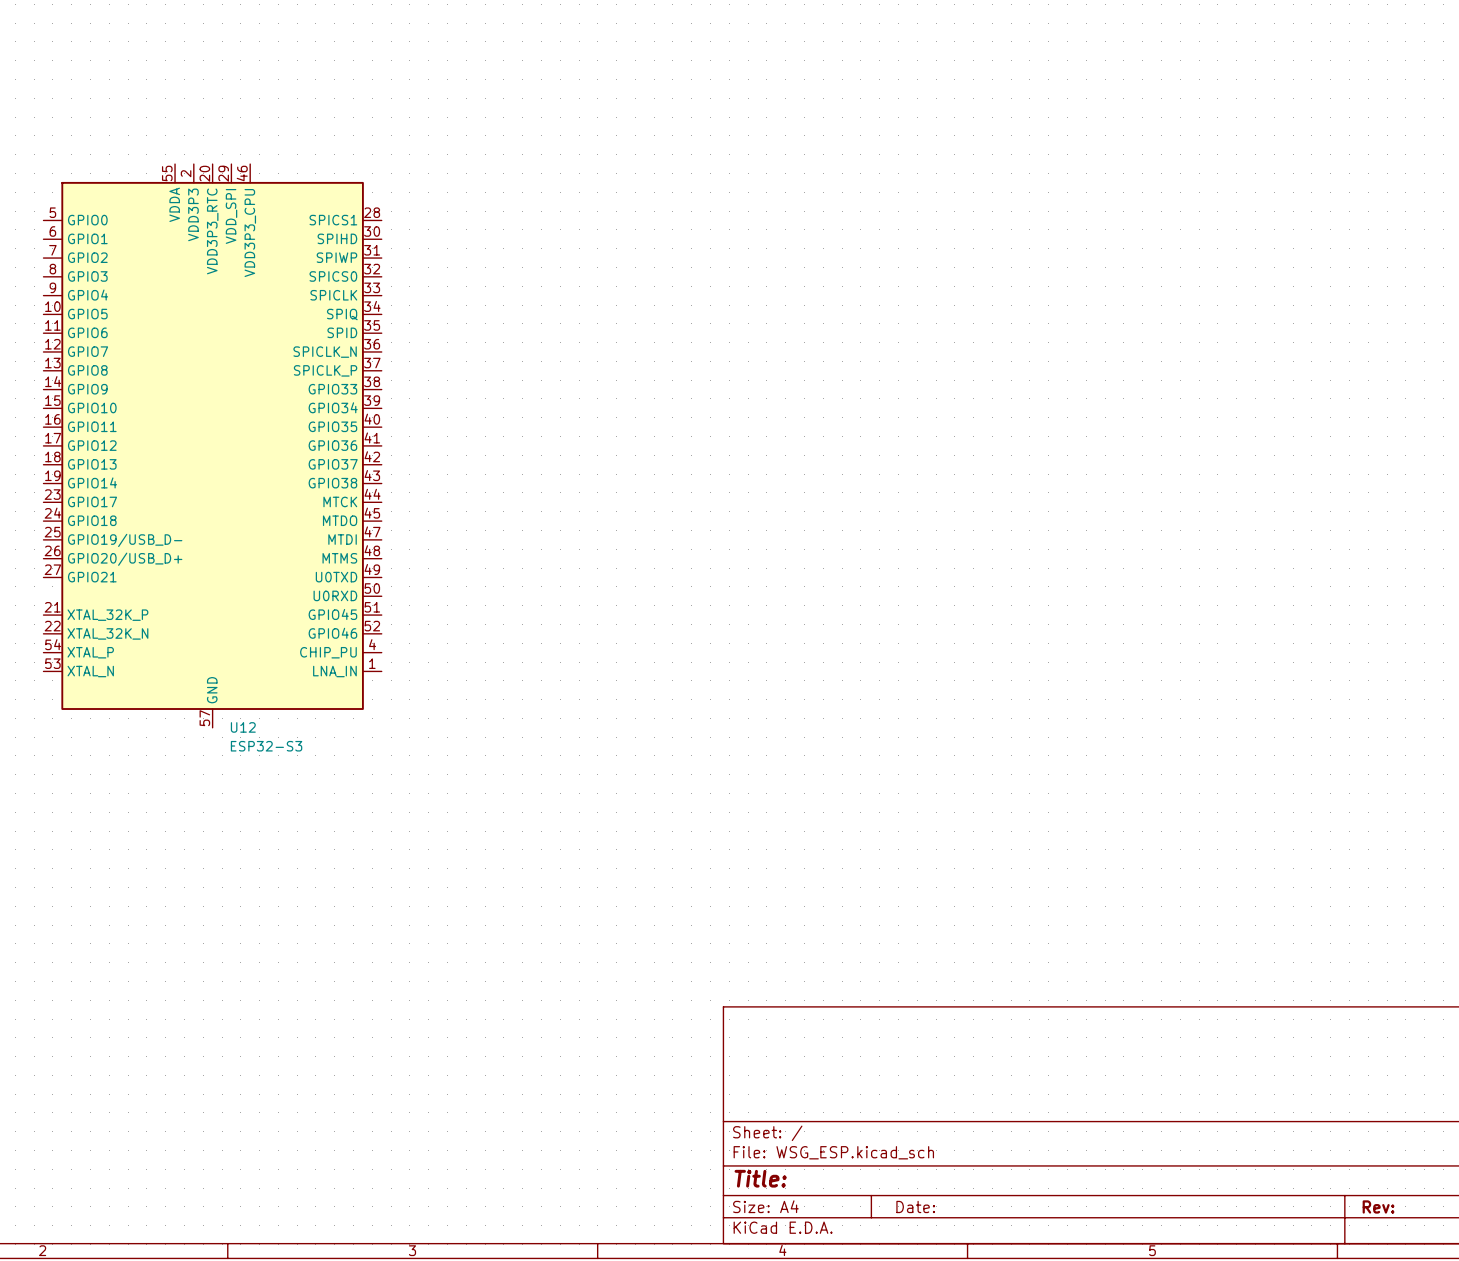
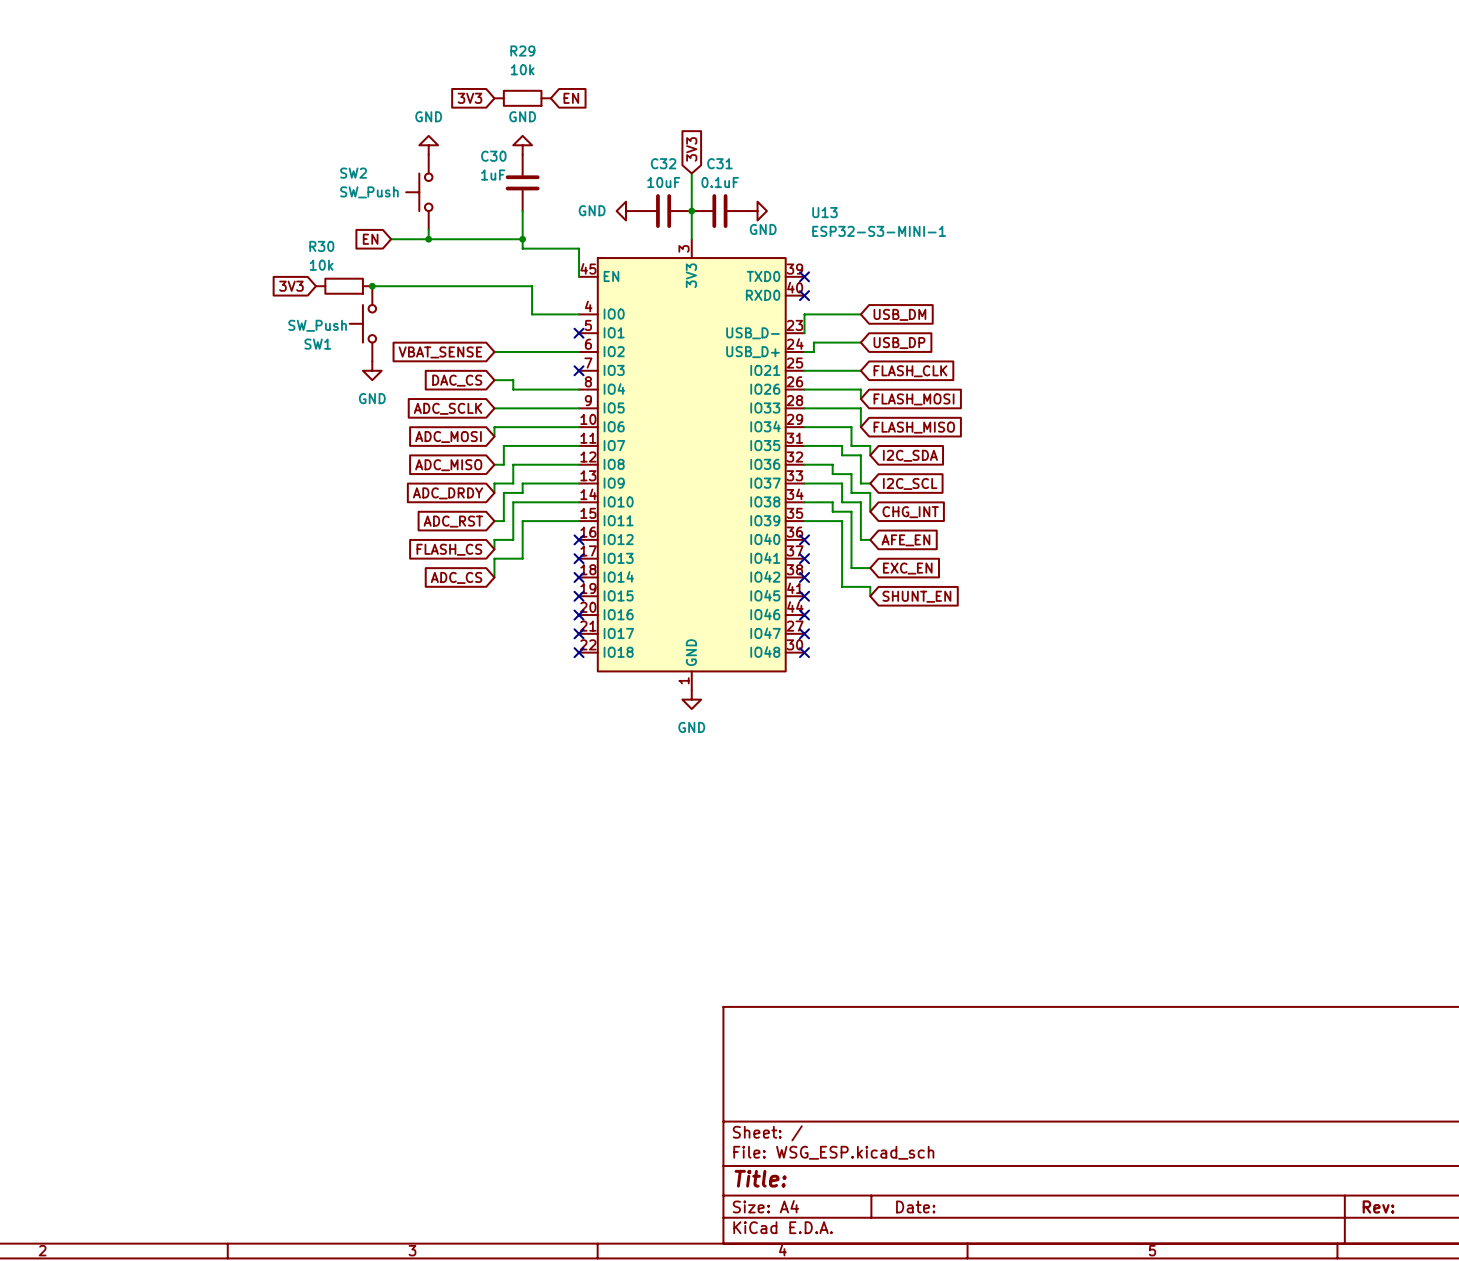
global label: none -> 3V3 (469, 98)
R29: none -> 10k (522, 98)
global label: none -> EN (571, 98)
power symbol: none -> GND (428, 145)
power symbol: none -> GND (522, 145)
global label: none -> 3V3 (691, 149)
wire: none -> (691, 173) (691, 239)
C30: none -> 1uF (522, 182)
SW2: none -> SW_Push (419, 192)
wire: none -> (522, 211) (522, 248) (579, 248) (579, 276)
power symbol: none -> GND (626, 211)
C32: none -> 10uF (663, 211)
junction: none -> (691, 211)
C31: none -> 0.1uF (719, 211)
power symbol: none -> GND (757, 211)
wire: none -> (428, 229) (428, 239)
global label: none -> EN (370, 239)
wire: none -> (391, 239) (522, 239)
junction: none -> (428, 239)
junction: none -> (522, 239)
no-connect mark: none -> (804, 276)
global label: none -> 3V3 (291, 286)
R30: none -> 10k (344, 286)
wire: none -> (372, 286) (532, 286) (532, 314) (579, 314)
junction: none -> (372, 286)
no-connect mark: none -> (804, 295)
wire: none -> (860, 314) (804, 314) (804, 333)
global label: none -> USB_DM (899, 314)
SW1: none -> SW_Push (362, 323)
no-connect mark: none -> (579, 333)
wire: none -> (860, 342) (813, 342) (813, 351) (804, 351)
global label: none -> USB_DP (899, 343)
wire: none -> (494, 351) (579, 351)
global label: none -> VBAT_SENSE (440, 352)
power symbol: none -> GND (372, 370)
no-connect mark: none -> (579, 370)
wire: none -> (804, 370) (860, 370)
global label: none -> FLASH_CLK (910, 371)
global label: none -> DAC_CS (457, 380)
wire: none -> (494, 380) (513, 380) (513, 389) (579, 389)
wire: none -> (804, 389) (860, 389) (860, 398)
global label: none -> FLASH_MOSI (914, 399)
global label: none -> ADC_SCLK (448, 408)
wire: none -> (494, 408) (579, 408)
wire: none -> (804, 408) (860, 408) (860, 427)
wire: none -> (579, 427) (494, 427) (494, 436)
wire: none -> (804, 427) (851, 427) (851, 445) (870, 445) (870, 455)
global label: none -> FLASH_MISO (914, 427)
global label: none -> ADC_MOSI (448, 436)
U12: ESP32-S3 (212, 445) -> none
wire: none -> (579, 445) (503, 445) (503, 464) (494, 464)
wire: none -> (804, 445) (842, 445) (842, 455) (860, 455) (860, 483) (870, 483)
global label: none -> I2C_SDA (910, 455)
wire: none -> (579, 464) (513, 464) (513, 483) (494, 483) (494, 492)
U13: none -> ESP32-S3-MINI-1 (691, 464)
wire: none -> (804, 464) (832, 464) (832, 474) (851, 474) (851, 492) (870, 492) (870, 511)
global label: none -> ADC_MISO (448, 465)
wire: none -> (579, 483) (522, 483) (522, 492) (503, 492) (503, 521) (494, 521)
wire: none -> (804, 483) (842, 483) (842, 502) (860, 502) (860, 539) (870, 539)
global label: none -> I2C_SCL (910, 483)
global label: none -> ADC_DRDY (448, 493)
wire: none -> (579, 502) (513, 502) (513, 539) (494, 539) (494, 549)
wire: none -> (804, 502) (832, 502) (832, 511) (851, 511) (851, 568) (870, 568)
global label: none -> CHG_INT (910, 512)
global label: none -> ADC_RST (453, 521)
wire: none -> (579, 521) (522, 521) (522, 558) (494, 558) (494, 577)
wire: none -> (804, 521) (842, 521) (842, 586) (870, 586) (870, 596)
no-connect mark: none -> (579, 539)
no-connect mark: none -> (804, 539)
global label: none -> AFE_EN (905, 540)
global label: none -> FLASH_CS (449, 549)
no-connect mark: none -> (579, 558)
no-connect mark: none -> (804, 558)
global label: none -> EXC_EN (907, 568)
global label: none -> ADC_CS (456, 577)
no-connect mark: none -> (579, 577)
no-connect mark: none -> (804, 577)
no-connect mark: none -> (579, 596)
no-connect mark: none -> (804, 596)
global label: none -> SHUNT_EN (916, 596)
no-connect mark: none -> (579, 615)
no-connect mark: none -> (804, 615)
no-connect mark: none -> (579, 633)
no-connect mark: none -> (804, 633)
no-connect mark: none -> (579, 652)
no-connect mark: none -> (804, 652)
power symbol: none -> GND (691, 699)

